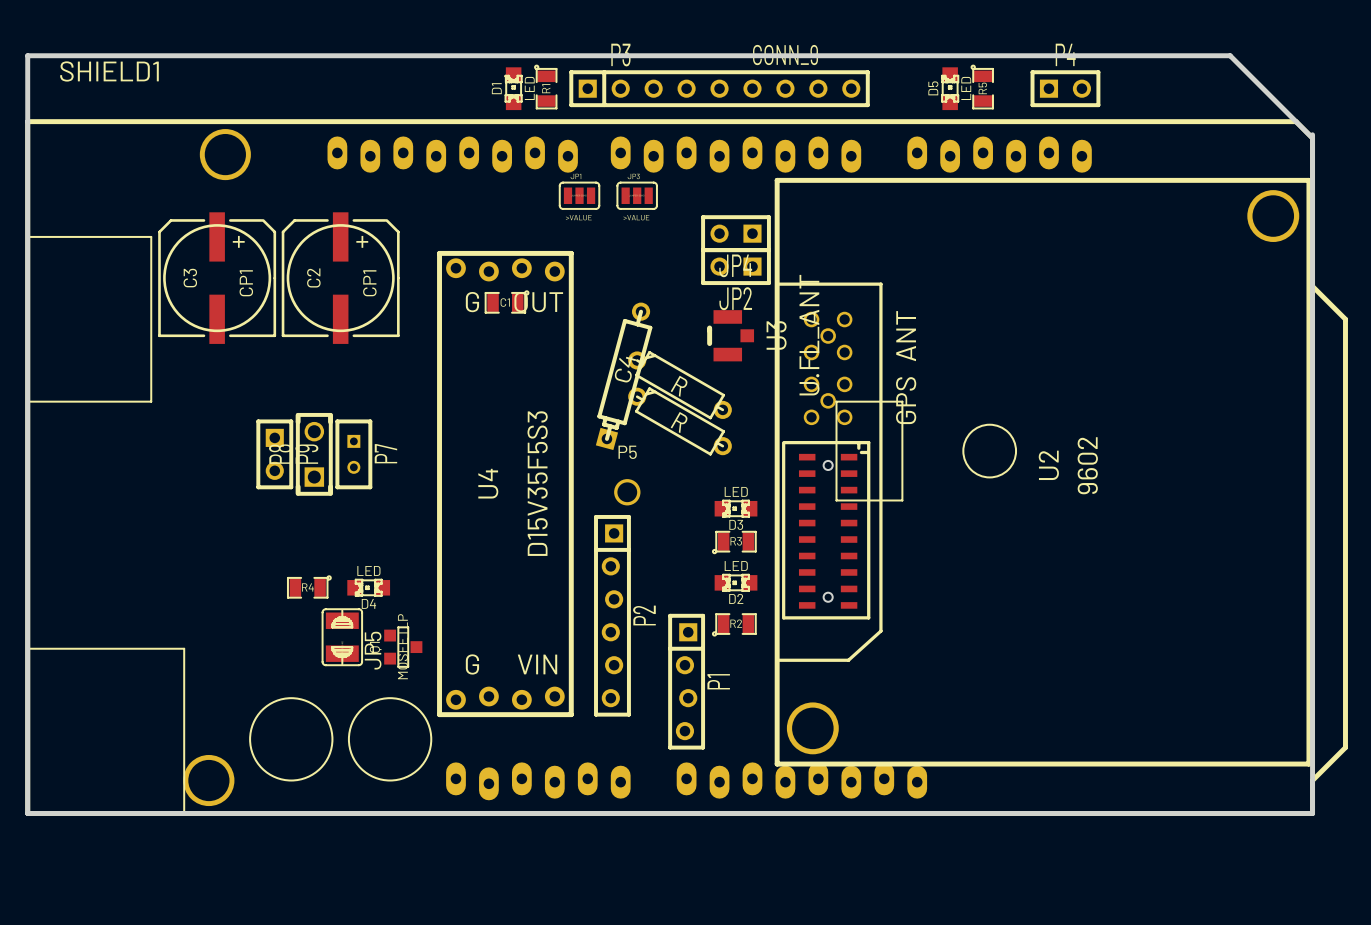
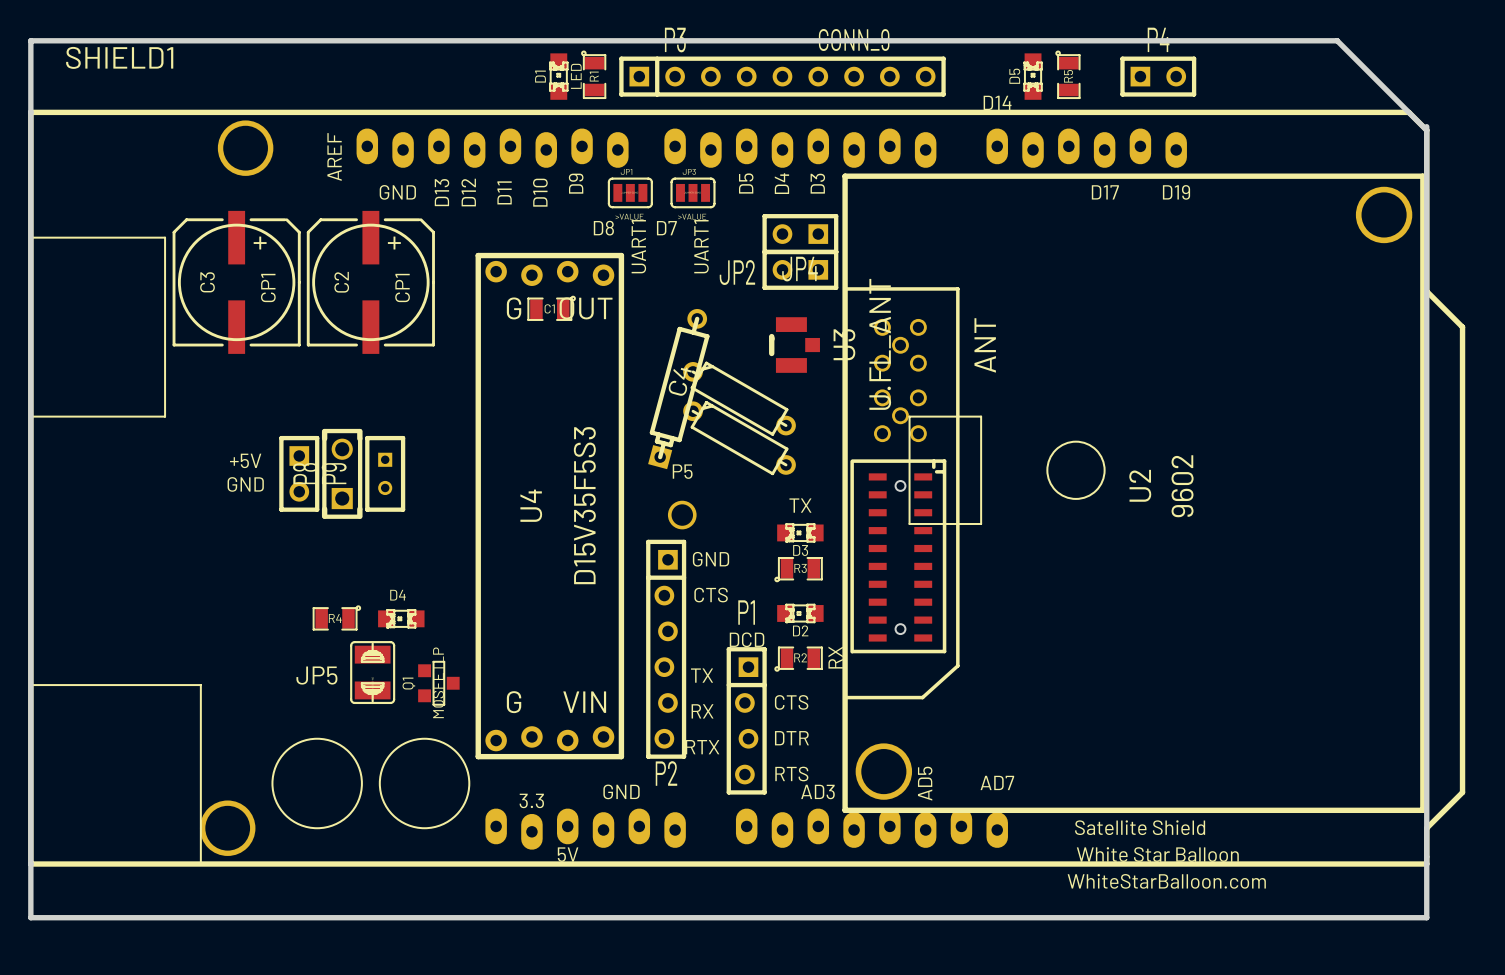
D5 value: LED (966, 88) -> none
text: none -> D14 (997, 102)
text: none -> AREF (334, 157)
text: none -> D9 (576, 183)
text: none -> D5 (746, 183)
text: none -> D4 (781, 183)
text: none -> D3 (817, 183)
text: none -> GND (397, 192)
text: none -> D13 (442, 192)
text: none -> D12 (468, 192)
text: none -> D11 (504, 192)
text: none -> D10 (540, 192)
text: none -> D17 (1105, 192)
text: none -> D19 (1176, 192)
text: none -> D8 (603, 228)
text: none -> D7 (666, 228)
text: none -> UART1 (638, 246)
text: none -> UART1 (701, 246)
JP2 name position: JP2 (735, 298) -> JP2 (737, 272)
part value: R (679, 386) -> none
U2 text: GPS (906, 400) -> none
part value: R (679, 422) -> none
text: none -> +5V (245, 460)
P7 name: P7 (385, 453) -> none
text: none -> GND (245, 484)
text: none -> TX (800, 505)
D3 value: LED (736, 491) -> none
text: none -> GND (711, 559)
text: none -> CTS (711, 595)
D2 value: LED (736, 566) -> none
D4 value: LED (368, 570) -> none
D4 name position: D4 (368, 603) -> D4 (397, 595)
text: none -> DCD (747, 639)
P2 name rotation: 0° (644, 615) -> 90° clockwise (666, 773)
P2 name position: P2 (644, 615) -> P2 (666, 773)
text: none -> RX (835, 657)
text: none -> TX (702, 675)
JP5 name rotation: 0° (373, 650) -> 90° clockwise (316, 675)
JP5 name position: JP5 (373, 650) -> JP5 (316, 675)
text: none -> CTS (791, 702)
text: none -> RX (702, 711)
P1 name rotation: 0° (718, 681) -> 90° clockwise (746, 612)
P1 name position: P1 (718, 681) -> P1 (746, 612)
text: none -> DTR (791, 738)
text: none -> RTX (702, 747)
text: none -> RTS (791, 774)
text: none -> AD7 (997, 782)
text: none -> AD5 (925, 783)
text: none -> GND (621, 791)
text: none -> AD3 (817, 791)
text: none -> 3.3 (531, 800)
text: none -> Satellite Shield (1140, 827)
text: none -> 5V (568, 854)
text: none -> White Star Balloon (1157, 854)
board edge: (27, 813) (1312, 813) -> (30, 864) (30, 917) (1426, 917) (1426, 864)
text: none -> WhiteStarBalloon.com (1166, 881)

